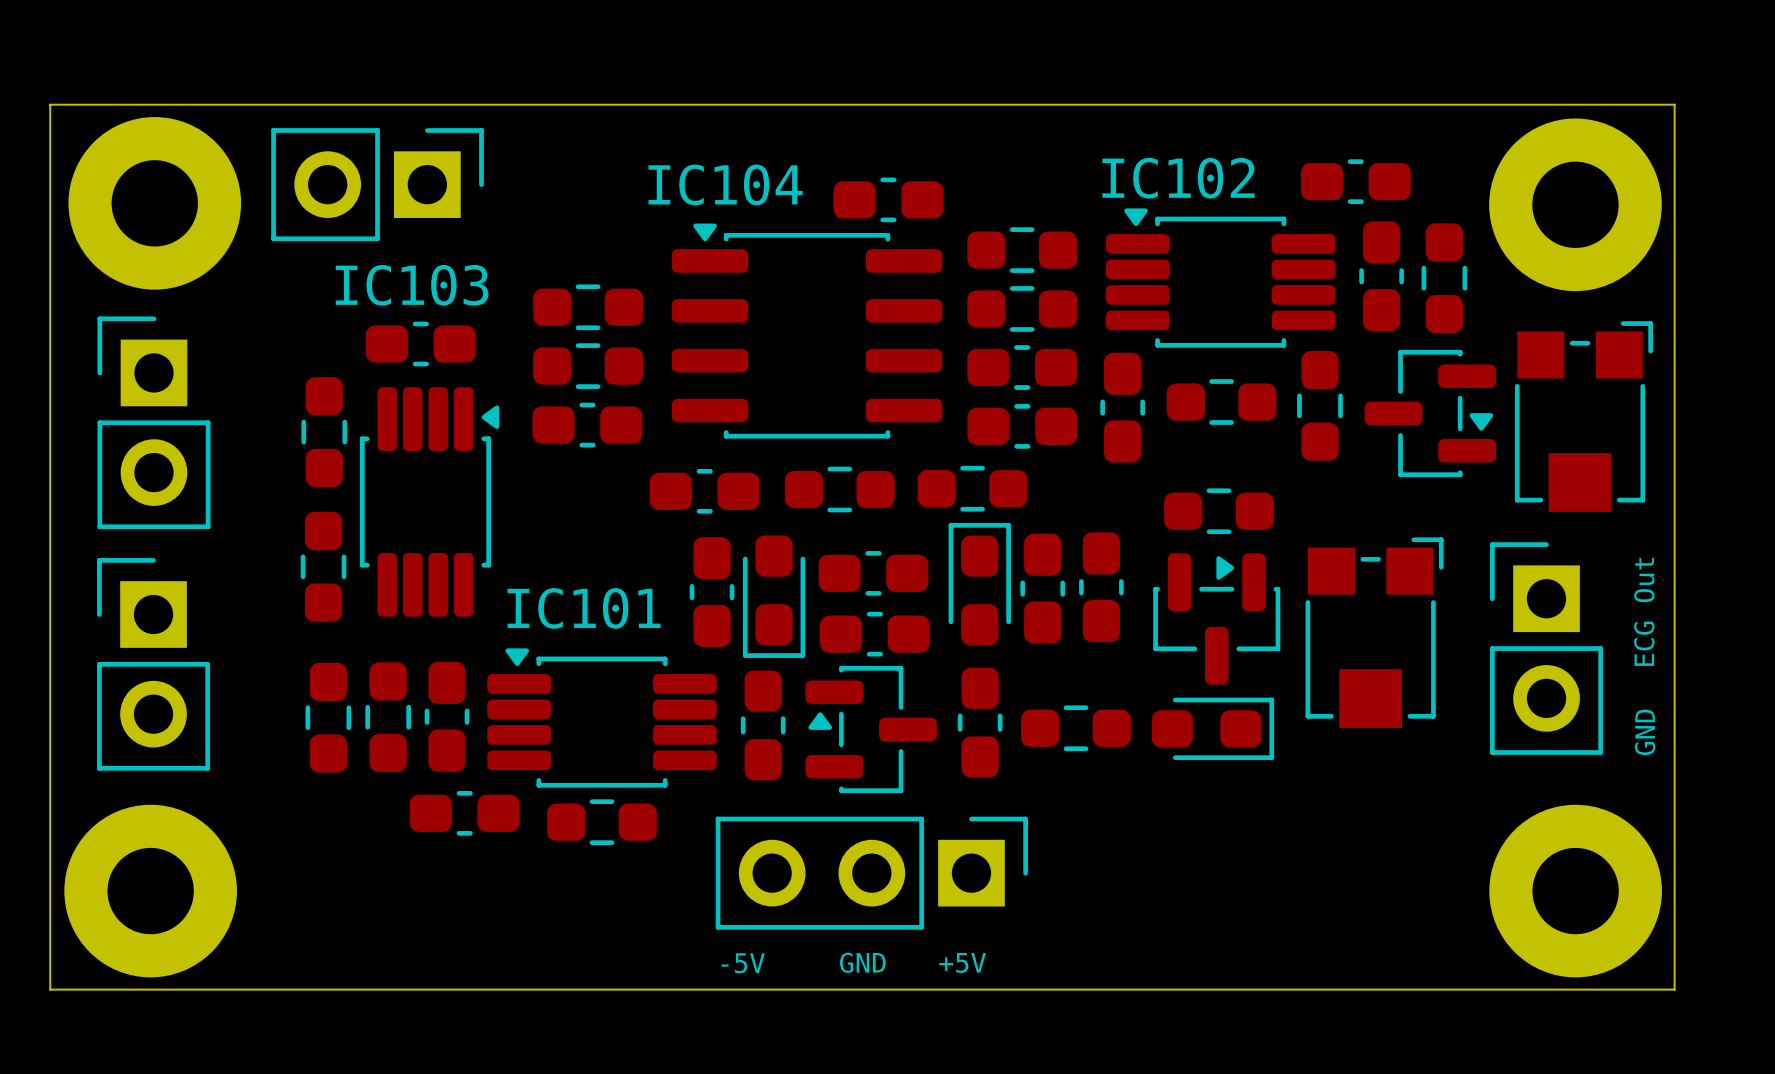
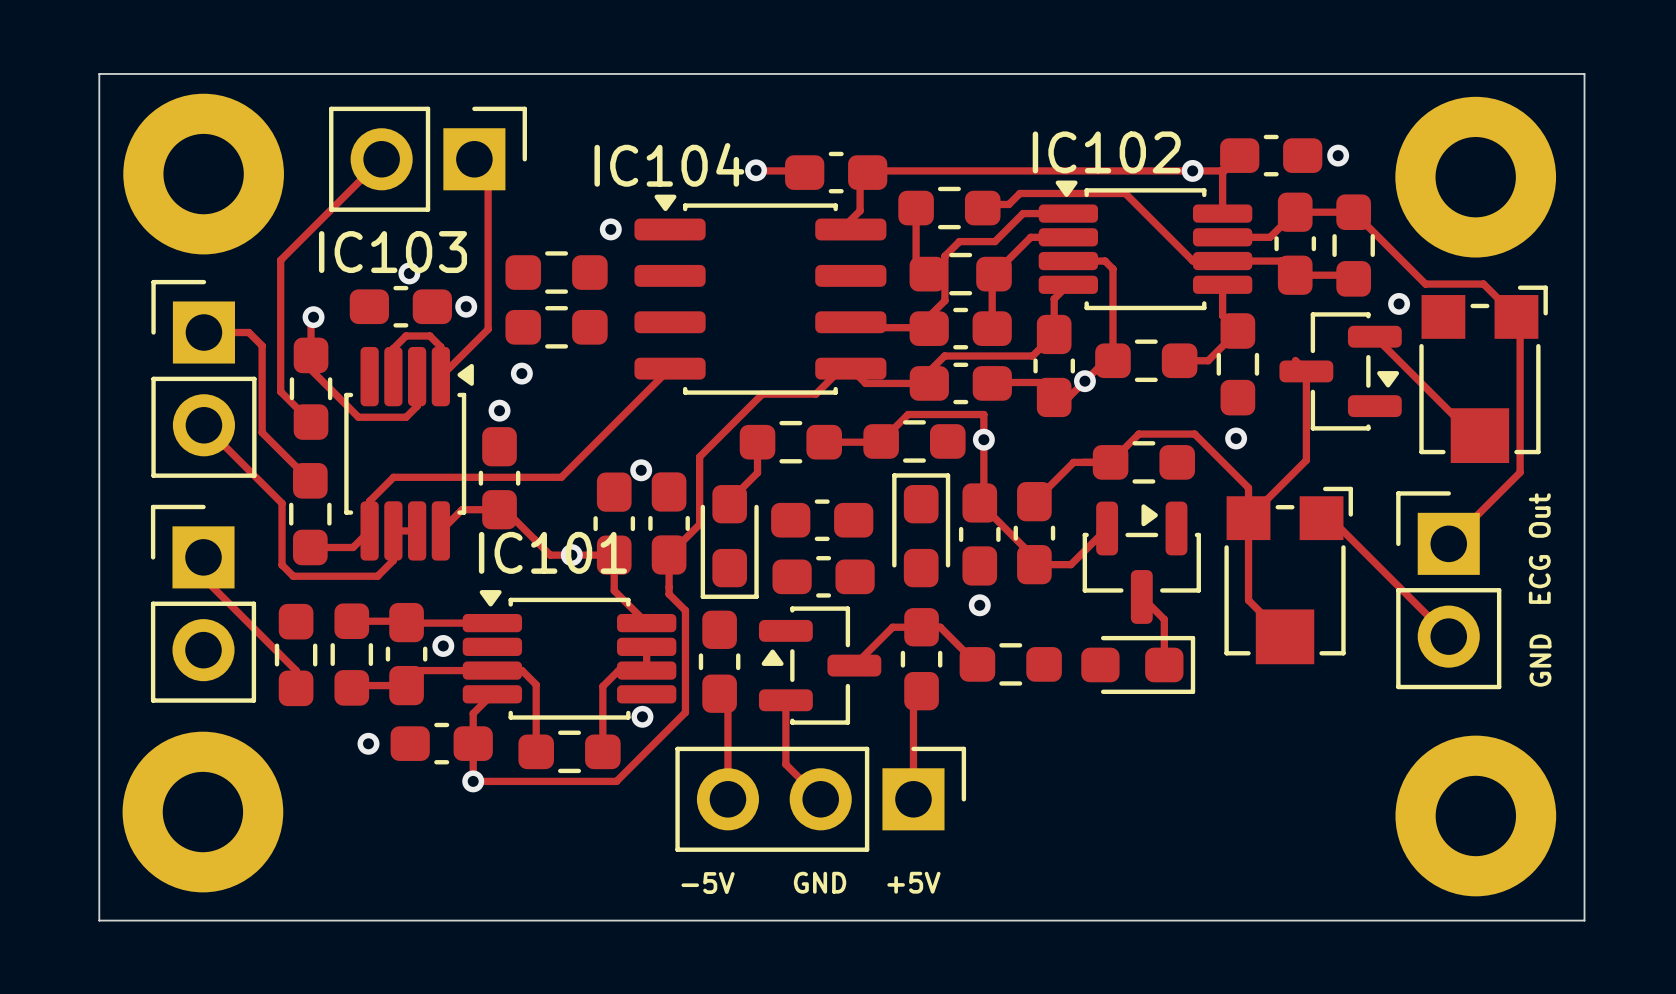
board edge: (50, 104) (1674, 104) (1674, 989) (50, 989) (50, 104) -> (99, 73) (99, 920) (1584, 920) (1584, 73) (99, 73)
via: none -> (1338, 155)
part position: (377, 184) -> (428, 159)
IC104 name position: IC104 (725, 184) -> IC104 (669, 164)
track: none -> (381, 159) (280, 260) (280, 391) (311, 422)
track: none -> (474, 159) (488, 172) (488, 329) (440, 376) (440, 346) (429, 336) (405, 336) (393, 348) (393, 376)
track: none -> (756, 170) (797, 170)
via: none -> (756, 170)
via: none -> (1192, 170)
track: none -> (1222, 172) (1222, 213)
track: none -> (1222, 172) (1220, 170) (860, 170) (860, 210) (842, 228)
part position: (154, 203) -> (203, 174)
track: none -> (982, 204) (1008, 204) (1019, 193) (1125, 193) (1192, 261) (1281, 261) (1295, 275) (1350, 275) (1353, 278)
track: none -> (916, 208) (916, 273)
track: none -> (1068, 213) (1023, 213) (995, 241) (959, 241) (944, 256) (944, 300) (918, 327) (849, 327) (842, 321)
part position: (1022, 250) -> (949, 208)
via: none -> (610, 229)
track: none -> (1068, 237) (1030, 237) (992, 275) (992, 328)
track: none -> (1222, 237) (1270, 237) (1295, 212) (1353, 212) (1425, 284) (1483, 284) (1520, 320) (1520, 472) (1448, 543)
track: none -> (1068, 261) (1105, 261) (1112, 269) (1112, 360) (1105, 360) (1068, 397) (1054, 397) (1039, 382) (981, 382)
via: none -> (409, 273)
track: none -> (1068, 284) (1054, 298) (1054, 334) (1032, 356) (944, 356) (918, 382)
track: none -> (1222, 284) (1222, 315) (1237, 330) (1208, 360) (1179, 360)
via: none -> (1399, 303)
via: none -> (466, 306)
track: none -> (313, 317) (311, 319) (311, 369) (358, 417) (406, 417) (417, 406) (417, 376)
via: none -> (313, 317)
track: none -> (203, 332) (248, 332) (262, 345) (262, 432) (310, 480) (310, 472)
track: none -> (1374, 336) (1473, 435) (1479, 435)
track: none -> (1295, 360) (1306, 371) (1306, 460) (1248, 518)
track: none -> (842, 367) (815, 394) (762, 394) (699, 456) (699, 524) (669, 554) (669, 594) (685, 610) (685, 712) (616, 781) (473, 781) (473, 713) (492, 694)
track: none -> (670, 368) (561, 477) (393, 477) (369, 501) (369, 530) (353, 547) (310, 547)
track: none -> (850, 368) (865, 383) (929, 383)
via: none -> (521, 373)
part position: (154, 422) -> (203, 378)
via: none -> (1084, 381)
part: (587, 425) -> none
via: none -> (499, 410)
track: none -> (203, 425) (282, 503) (282, 564) (293, 576) (377, 576) (393, 560) (393, 530) (417, 530)
via: none -> (1236, 438)
via: none -> (983, 439)
track: none -> (757, 442) (757, 472) (729, 500)
track: none -> (824, 442) (880, 442) (908, 414) (983, 414) (983, 498) (979, 502) (1034, 557) (1034, 564) (1070, 564) (1107, 528)
part: (704, 491) -> none
via: none -> (641, 470)
part: none -> (499, 478)
track: none -> (1034, 501) (1073, 462) (1110, 462) (1138, 434) (1194, 434) (1248, 487) (1248, 600) (1285, 636)
track: none -> (1321, 518) (1330, 518) (1448, 636)
part: none -> (614, 523)
track: none -> (440, 530) (462, 509) (504, 509) (550, 555) (614, 555) (614, 590) (646, 623)
part position: (712, 592) -> (669, 523)
via: none -> (571, 555)
track: none -> (203, 557) (203, 577) (296, 670) (296, 688)
track: none -> (1141, 596) (1164, 619) (1164, 664)
part position: (153, 664) -> (203, 603)
via: none -> (979, 605)
track: none -> (351, 621) (405, 621) (407, 623) (491, 622)
via: none -> (443, 645)
track: none -> (646, 646) (646, 670) (618, 670) (602, 686) (602, 751)
part position: (447, 716) -> (406, 654)
part: (328, 717) -> none
part: none -> (351, 654)
part: (388, 717) -> none
part: none -> (296, 655)
track: none -> (977, 664) (940, 627) (892, 627) (854, 665)
track: none -> (351, 687) (354, 685) (406, 685) (421, 670) (522, 670) (536, 684) (536, 751)
track: none -> (921, 691) (913, 699) (913, 799)
track: none -> (719, 693) (727, 702) (727, 799)
track: none -> (785, 700) (785, 764) (820, 799)
via: none -> (642, 716)
via: none -> (368, 743)
via: none -> (473, 781)
part position: (150, 891) -> (202, 812)

